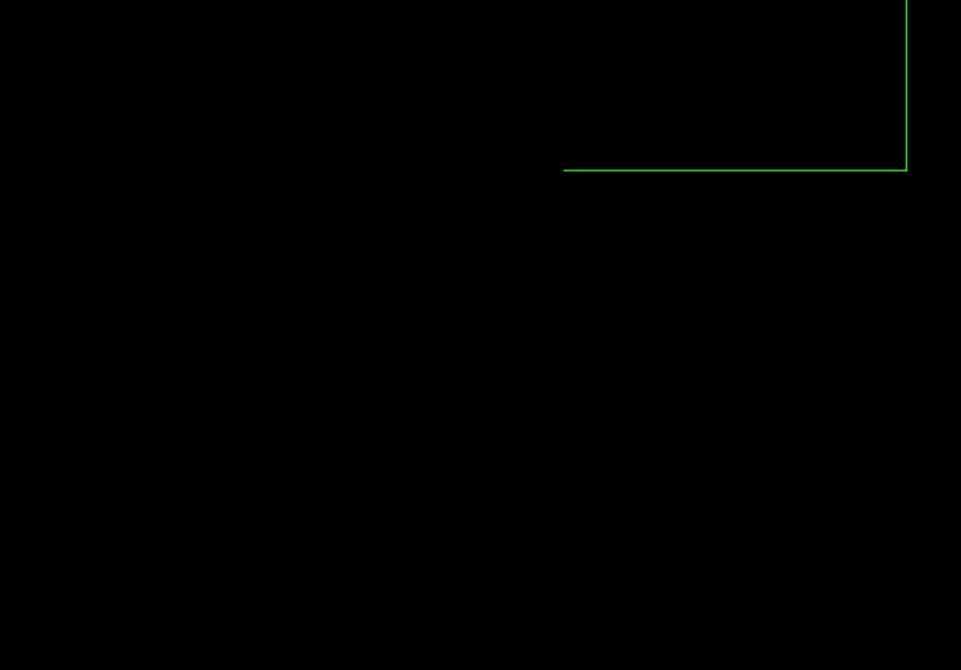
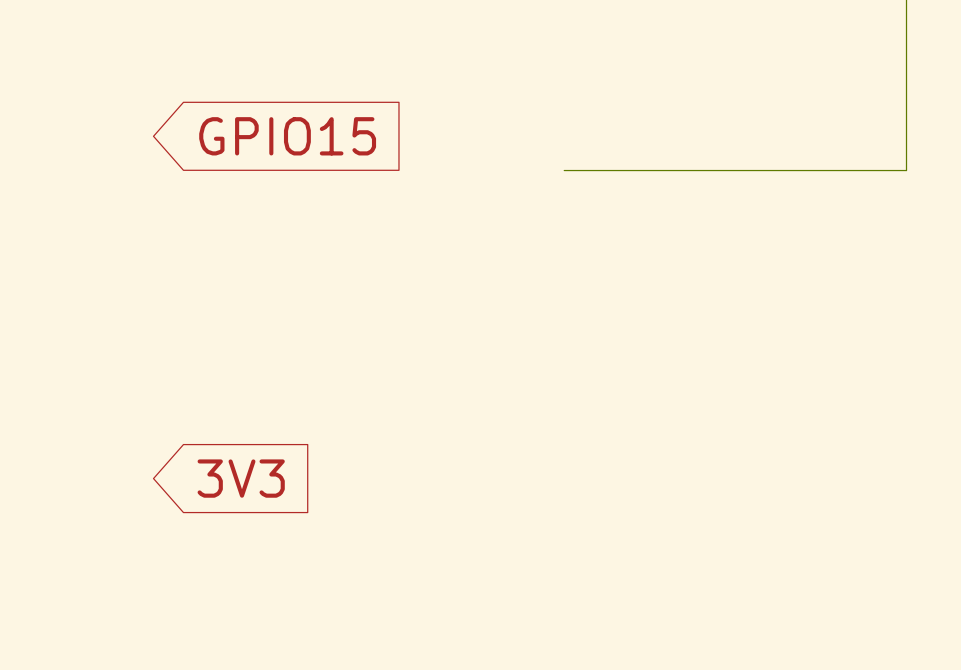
global label: none -> GPIO15 (287, 136)
global label: none -> 3V3 (241, 478)

